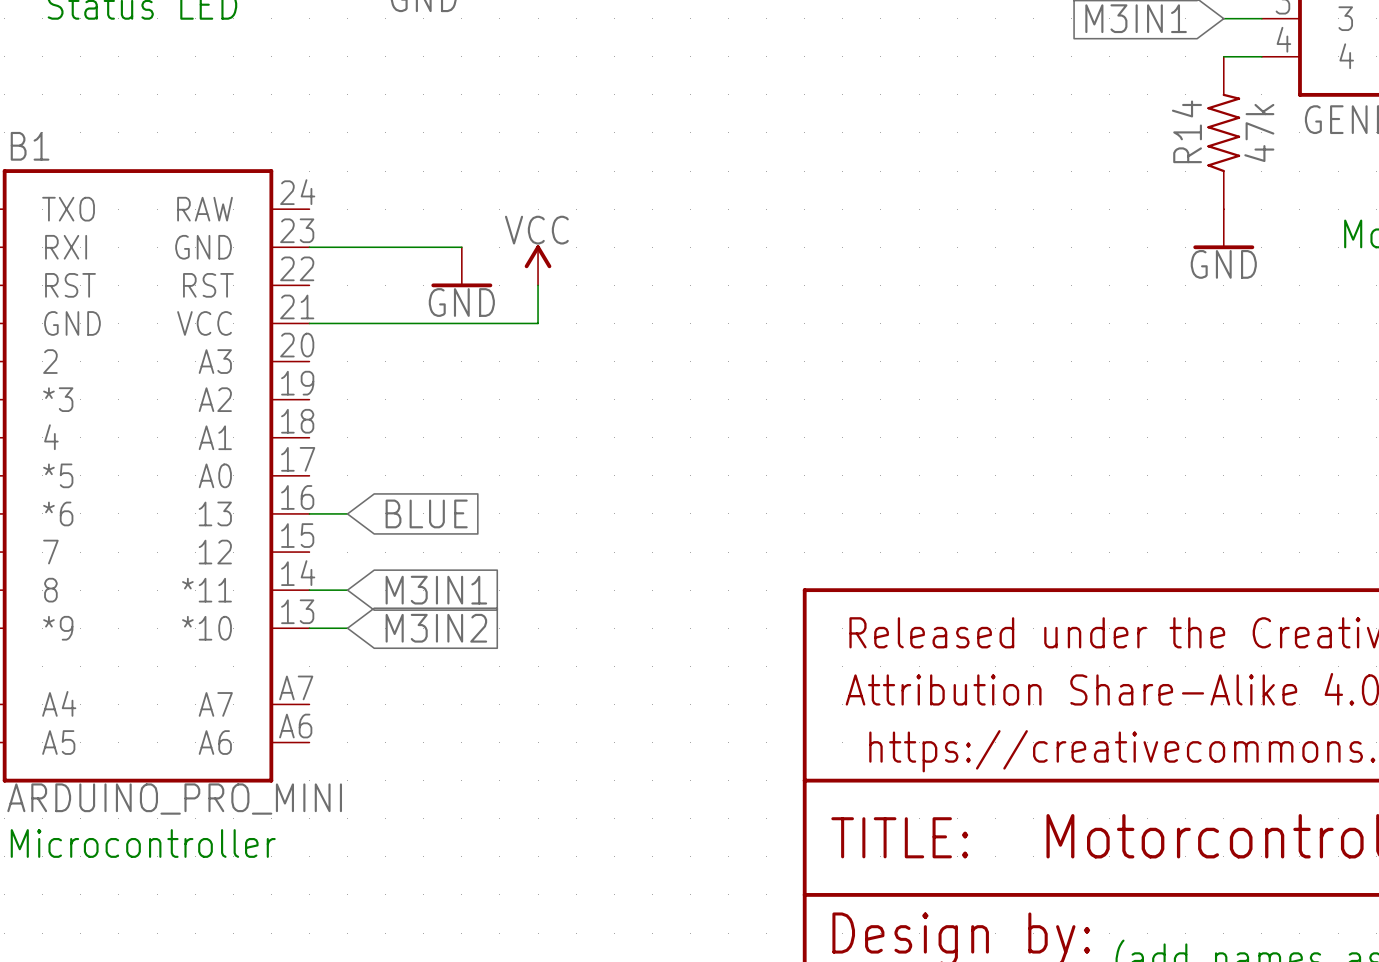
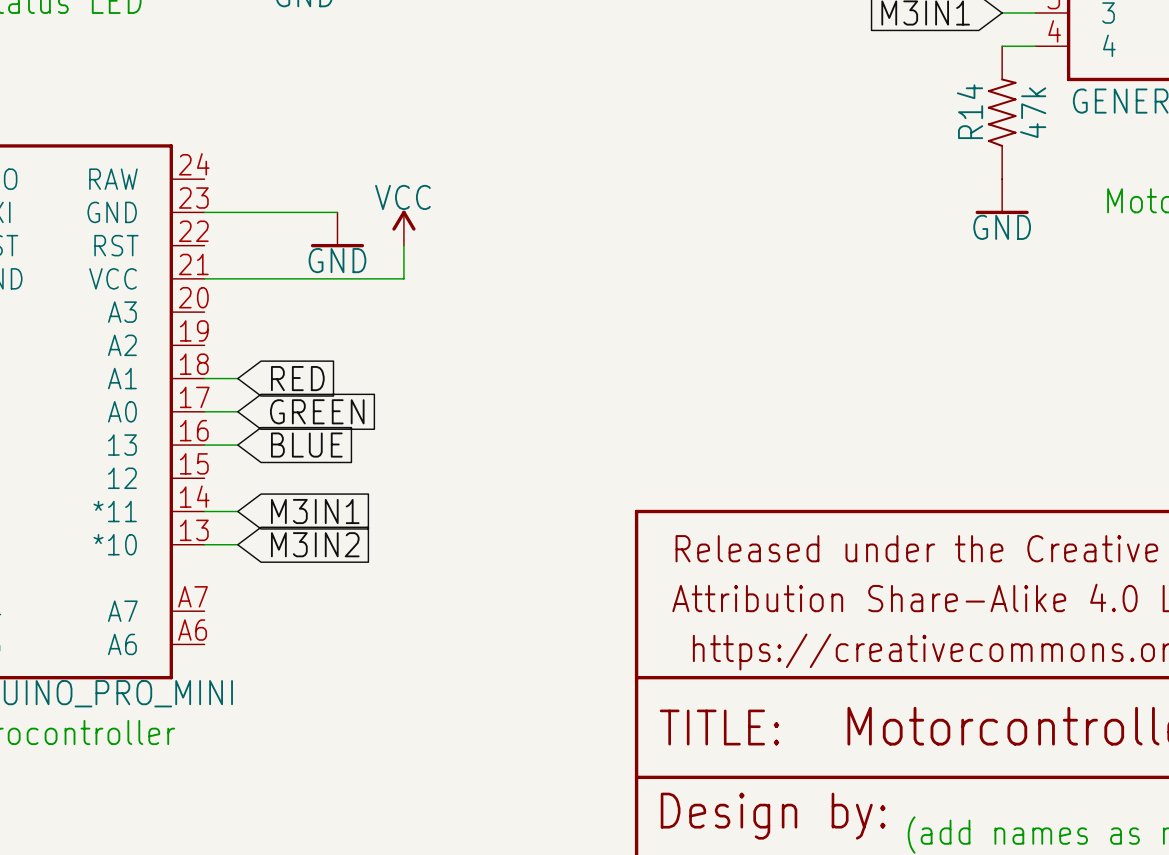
wire: none -> (204, 378) (237, 378)
global label: none -> RED (297, 378)
wire: none -> (204, 411) (237, 411)
global label: none -> GREEN (317, 411)

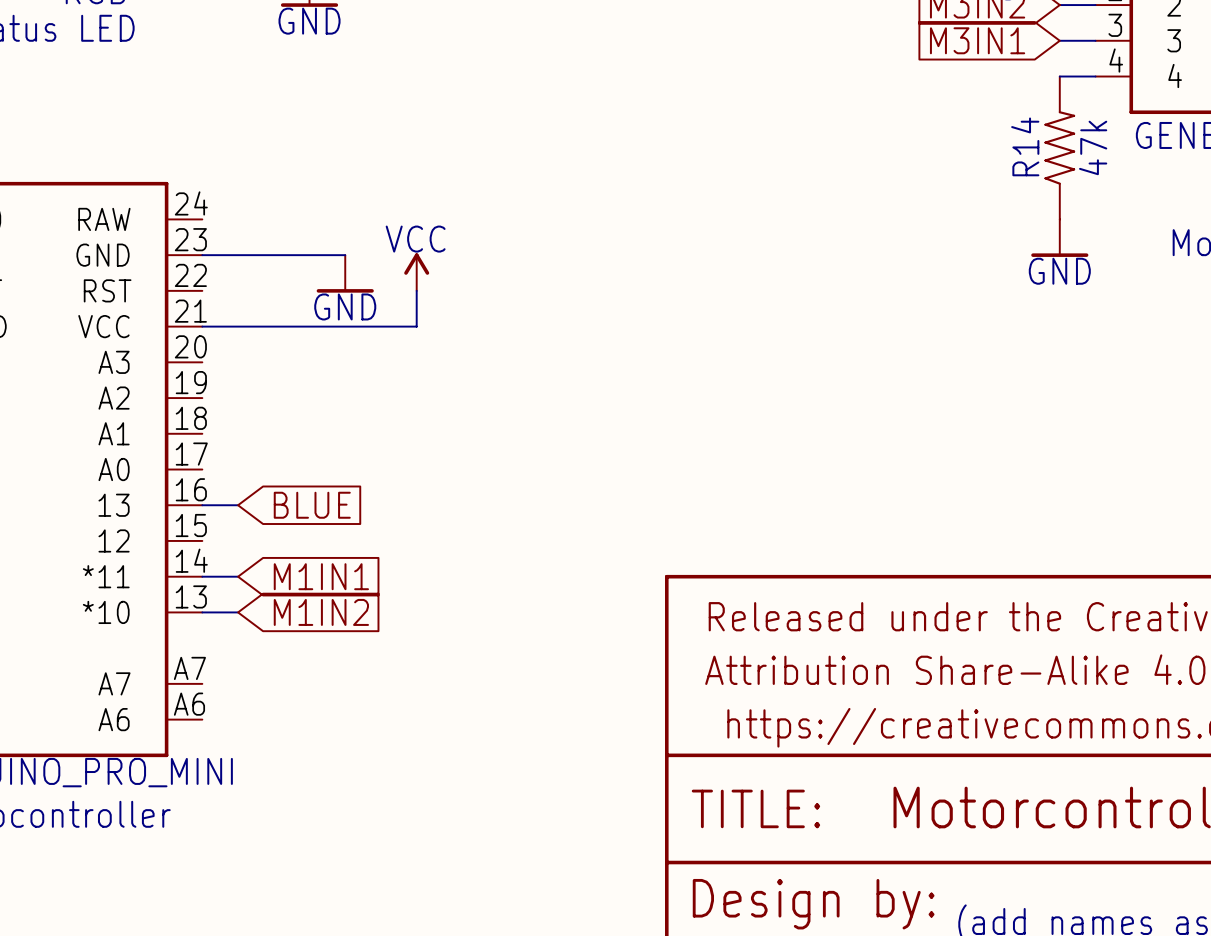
wire: (204, 378) (237, 378) -> none
global label: RED (297, 378) -> none
wire: (204, 411) (237, 411) -> none
global label: GREEN (317, 411) -> none
global label: M3IN1 (315, 511) -> M1IN1 (321, 576)
global label: M3IN2 (315, 544) -> M1IN2 (321, 612)

